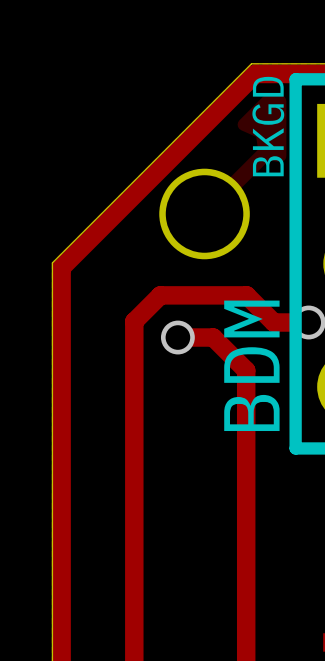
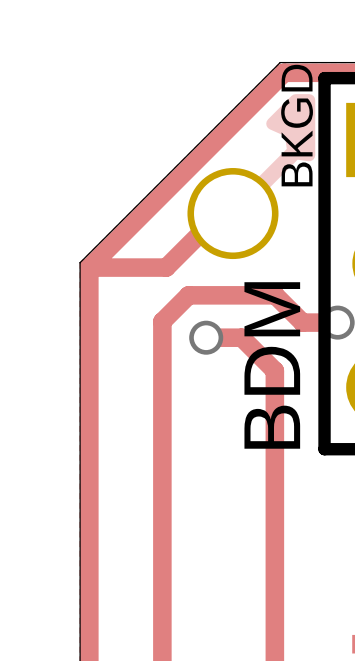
track: none -> (232, 213) (220, 213) (166, 267) (89, 267)
text: none -> BDM (272, 365)
part value: BDM (251, 365) -> none

